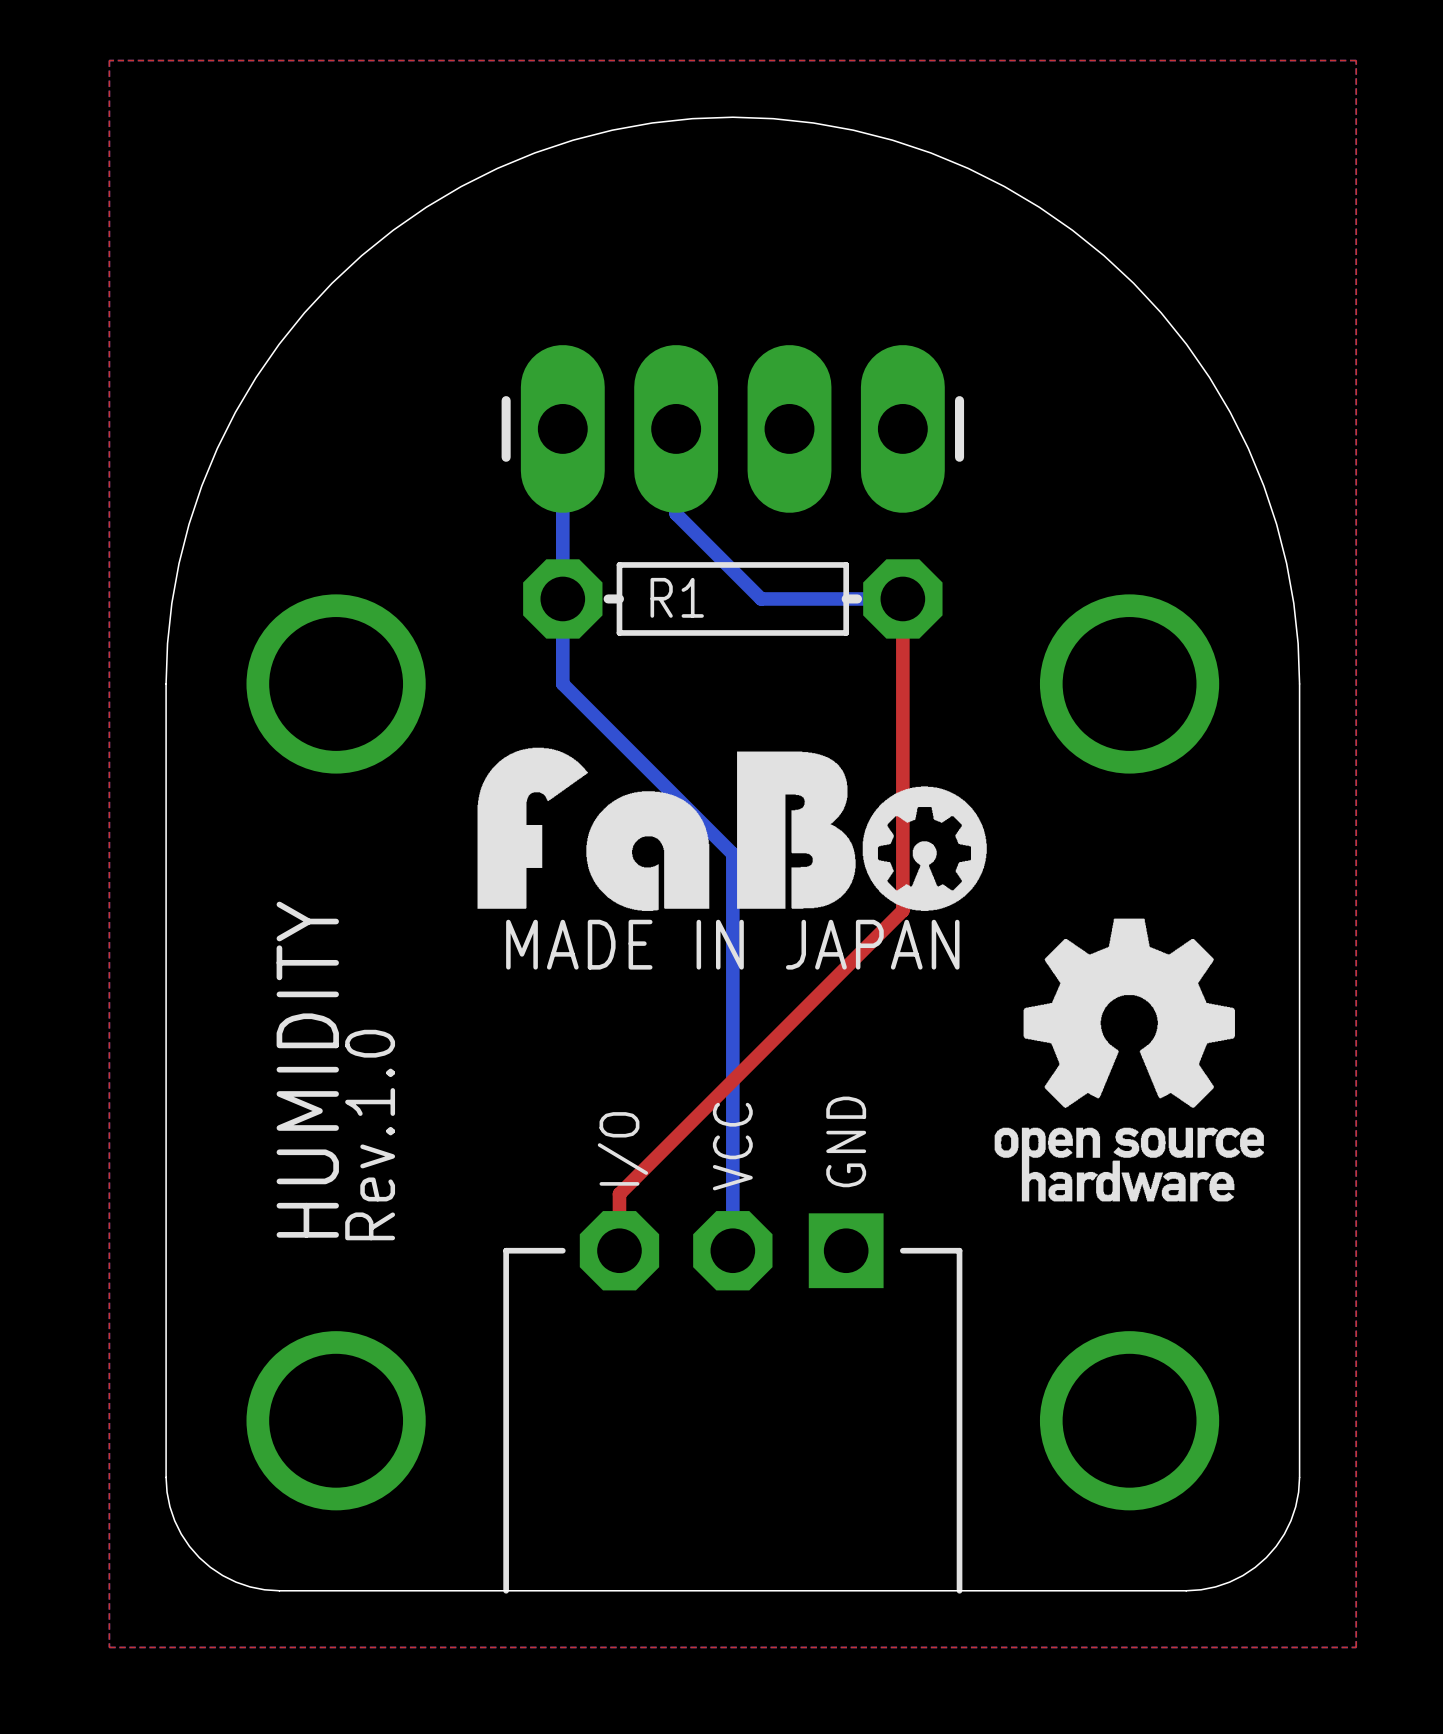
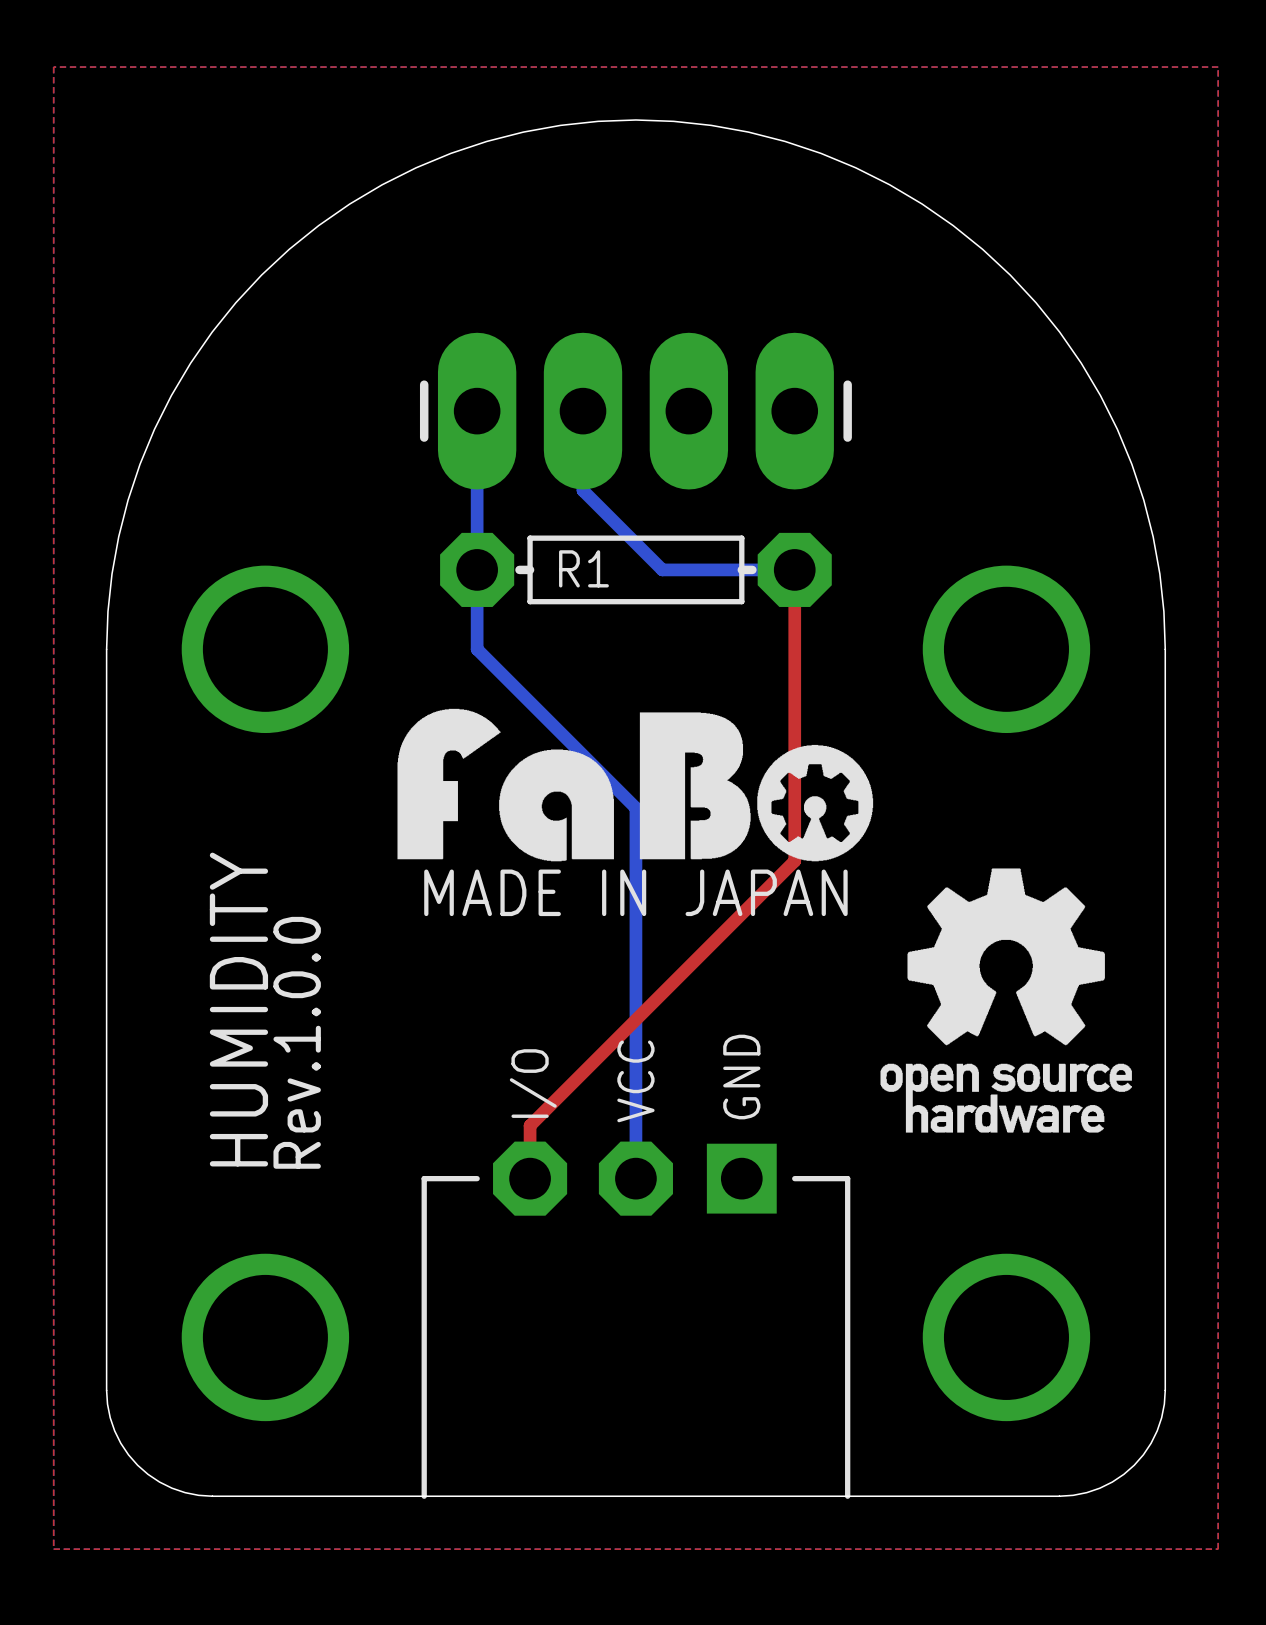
text: Rev.1.0 (370, 1135) -> Rev.1.0.0 (297, 1042)

